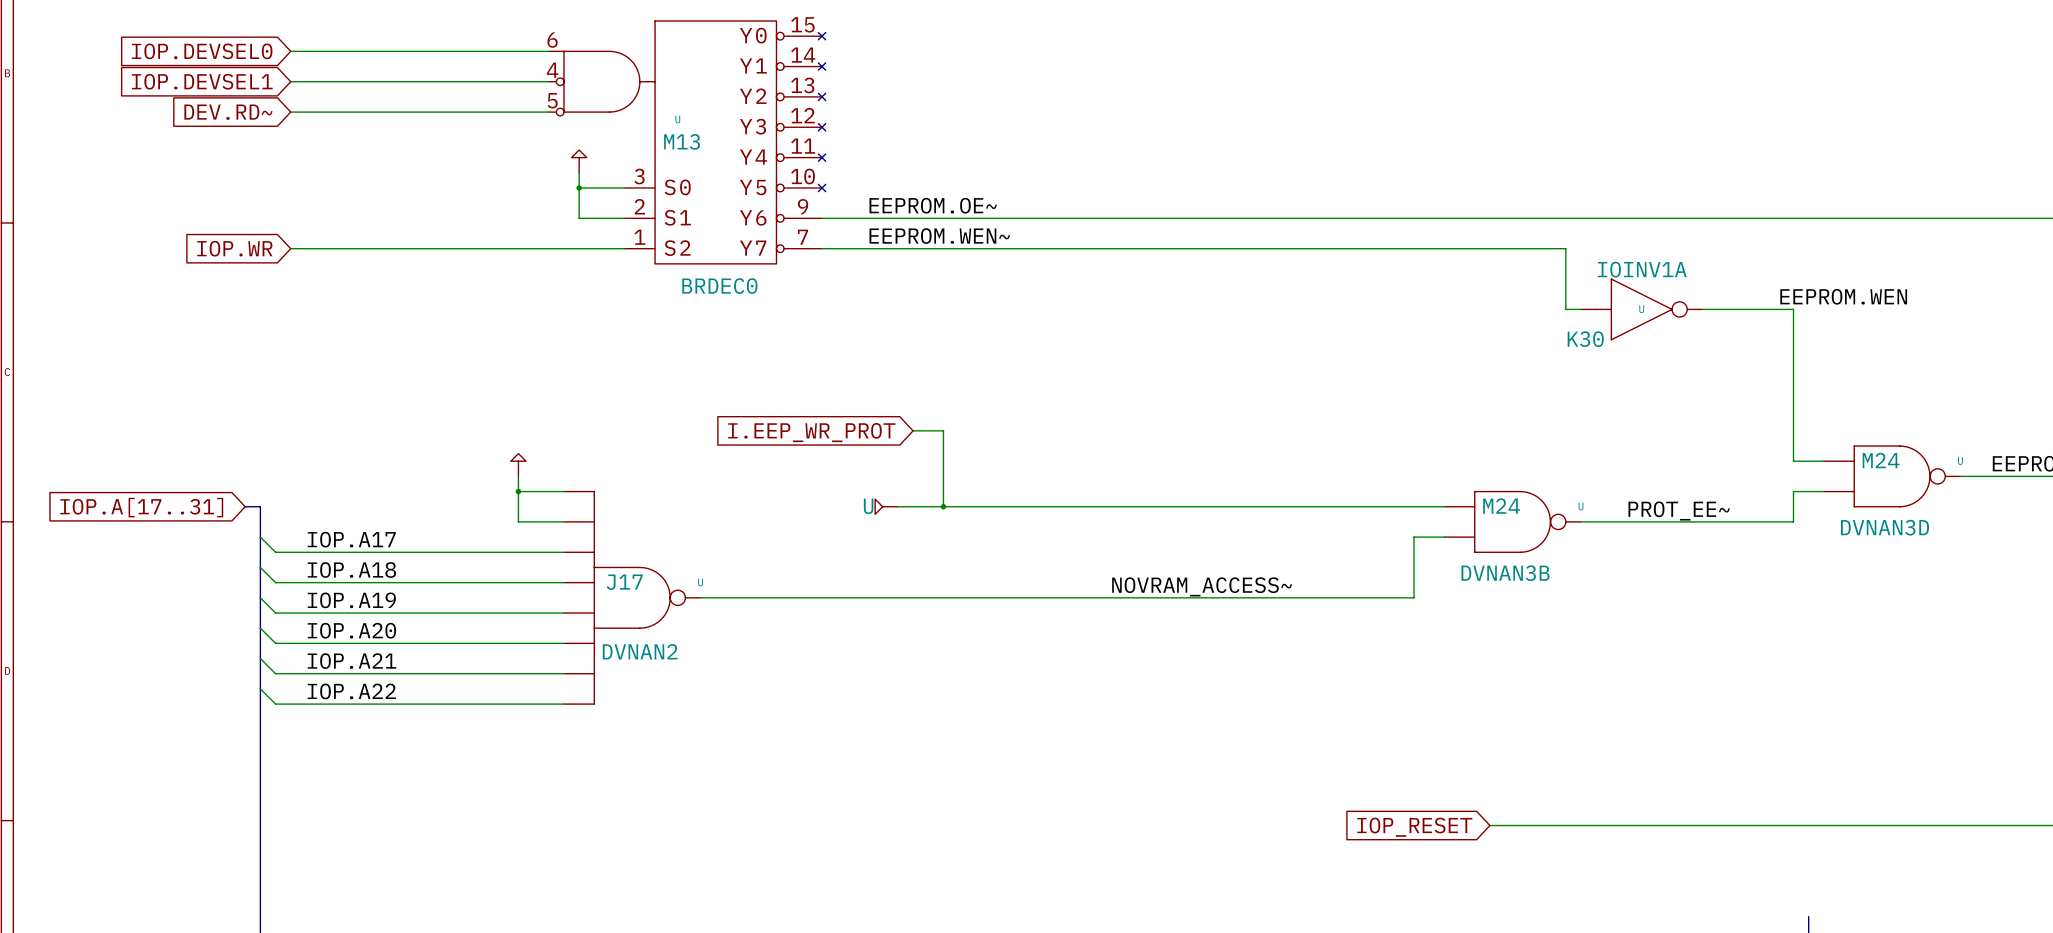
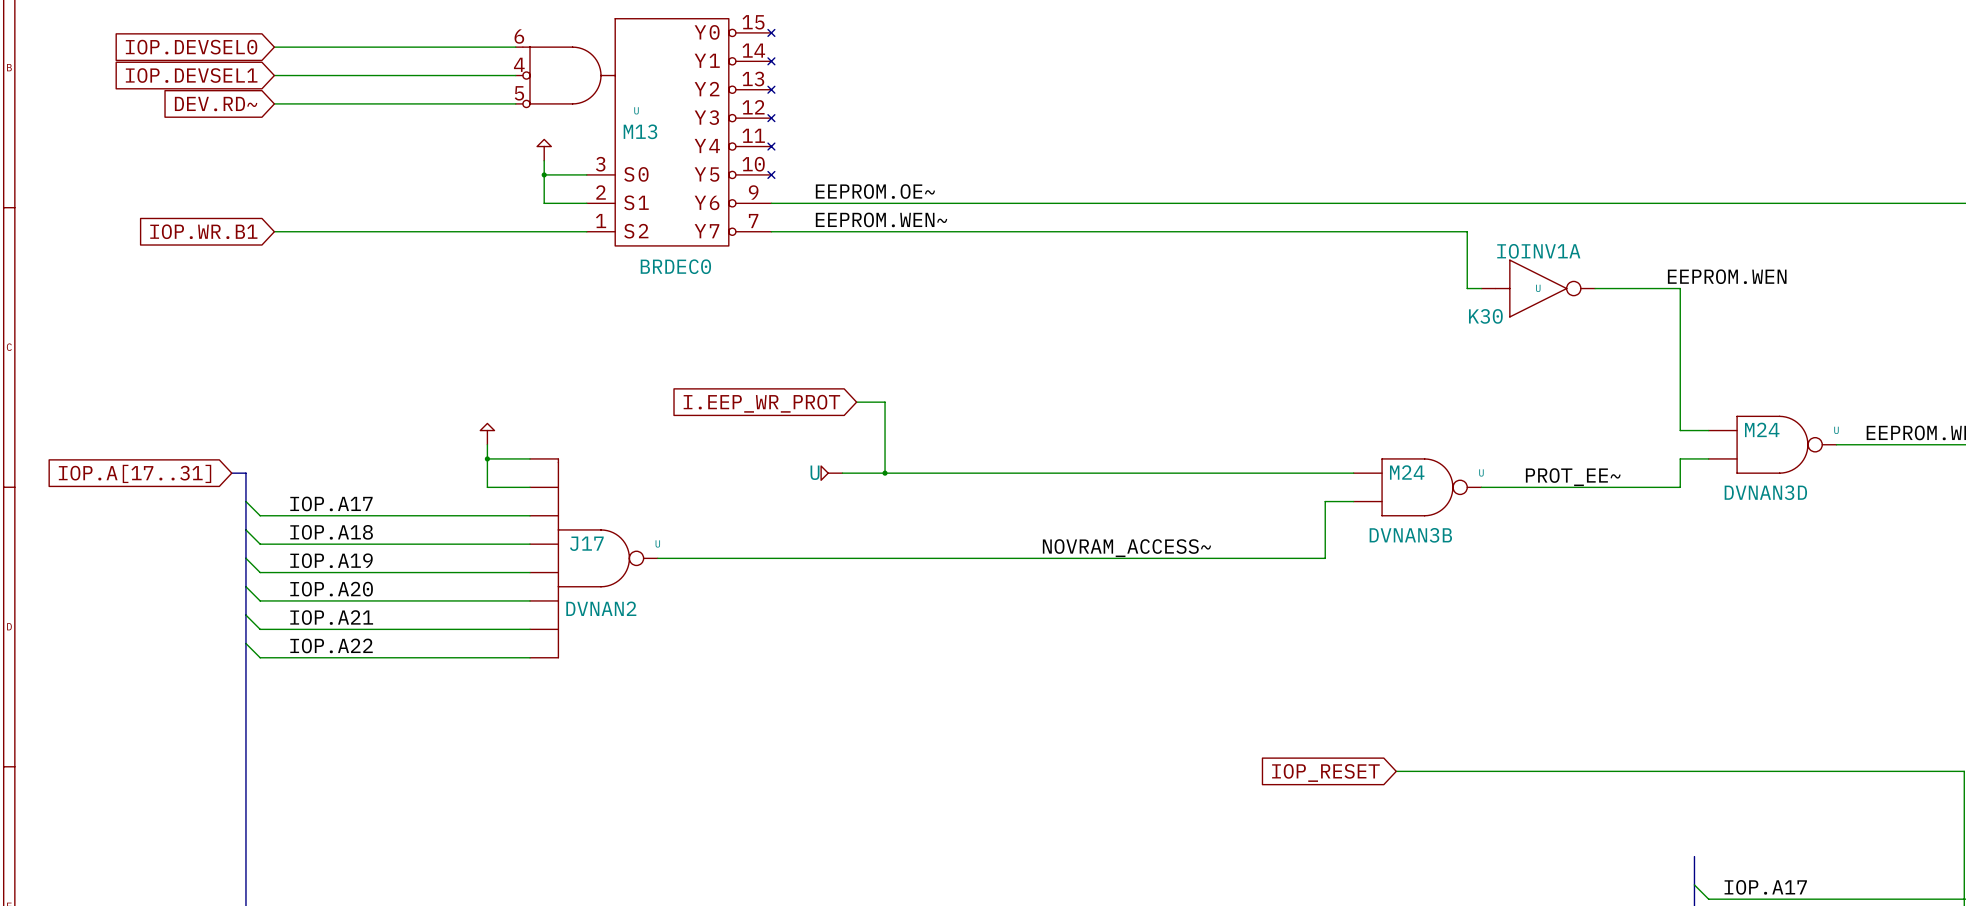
global label: IOP.WR (234, 248) -> IOP.WR.B1 (203, 231)

